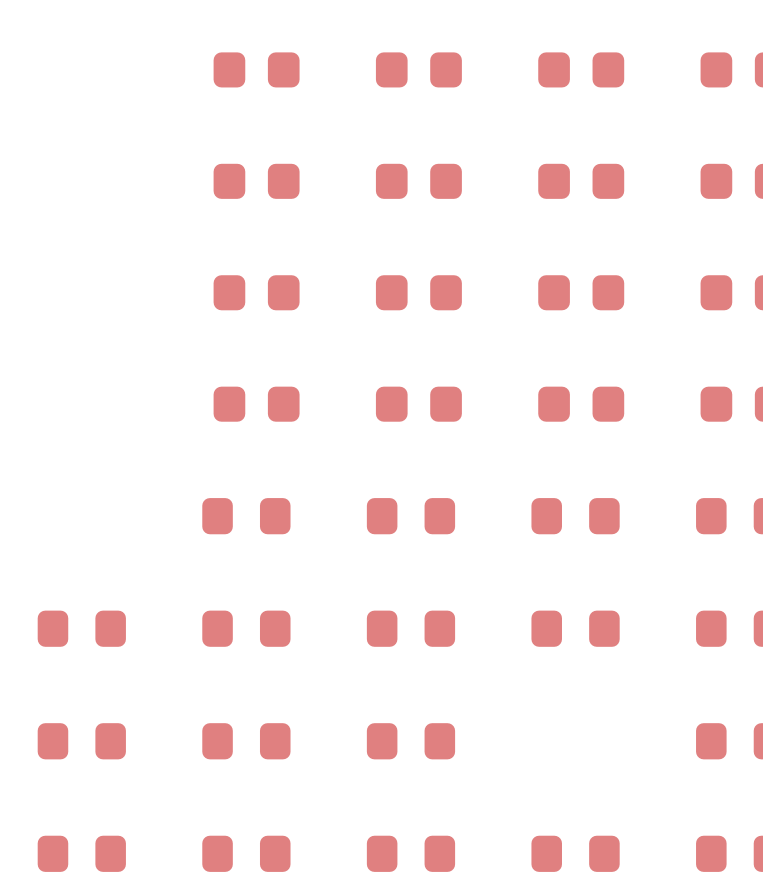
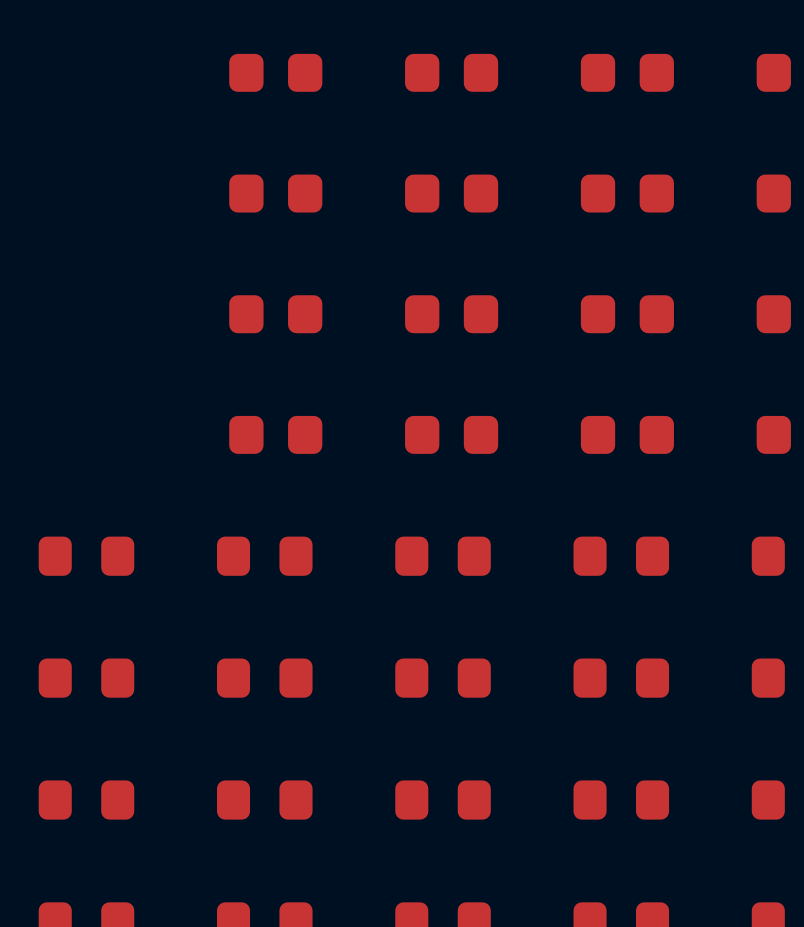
part: none -> (86, 556)
part: none -> (621, 800)

